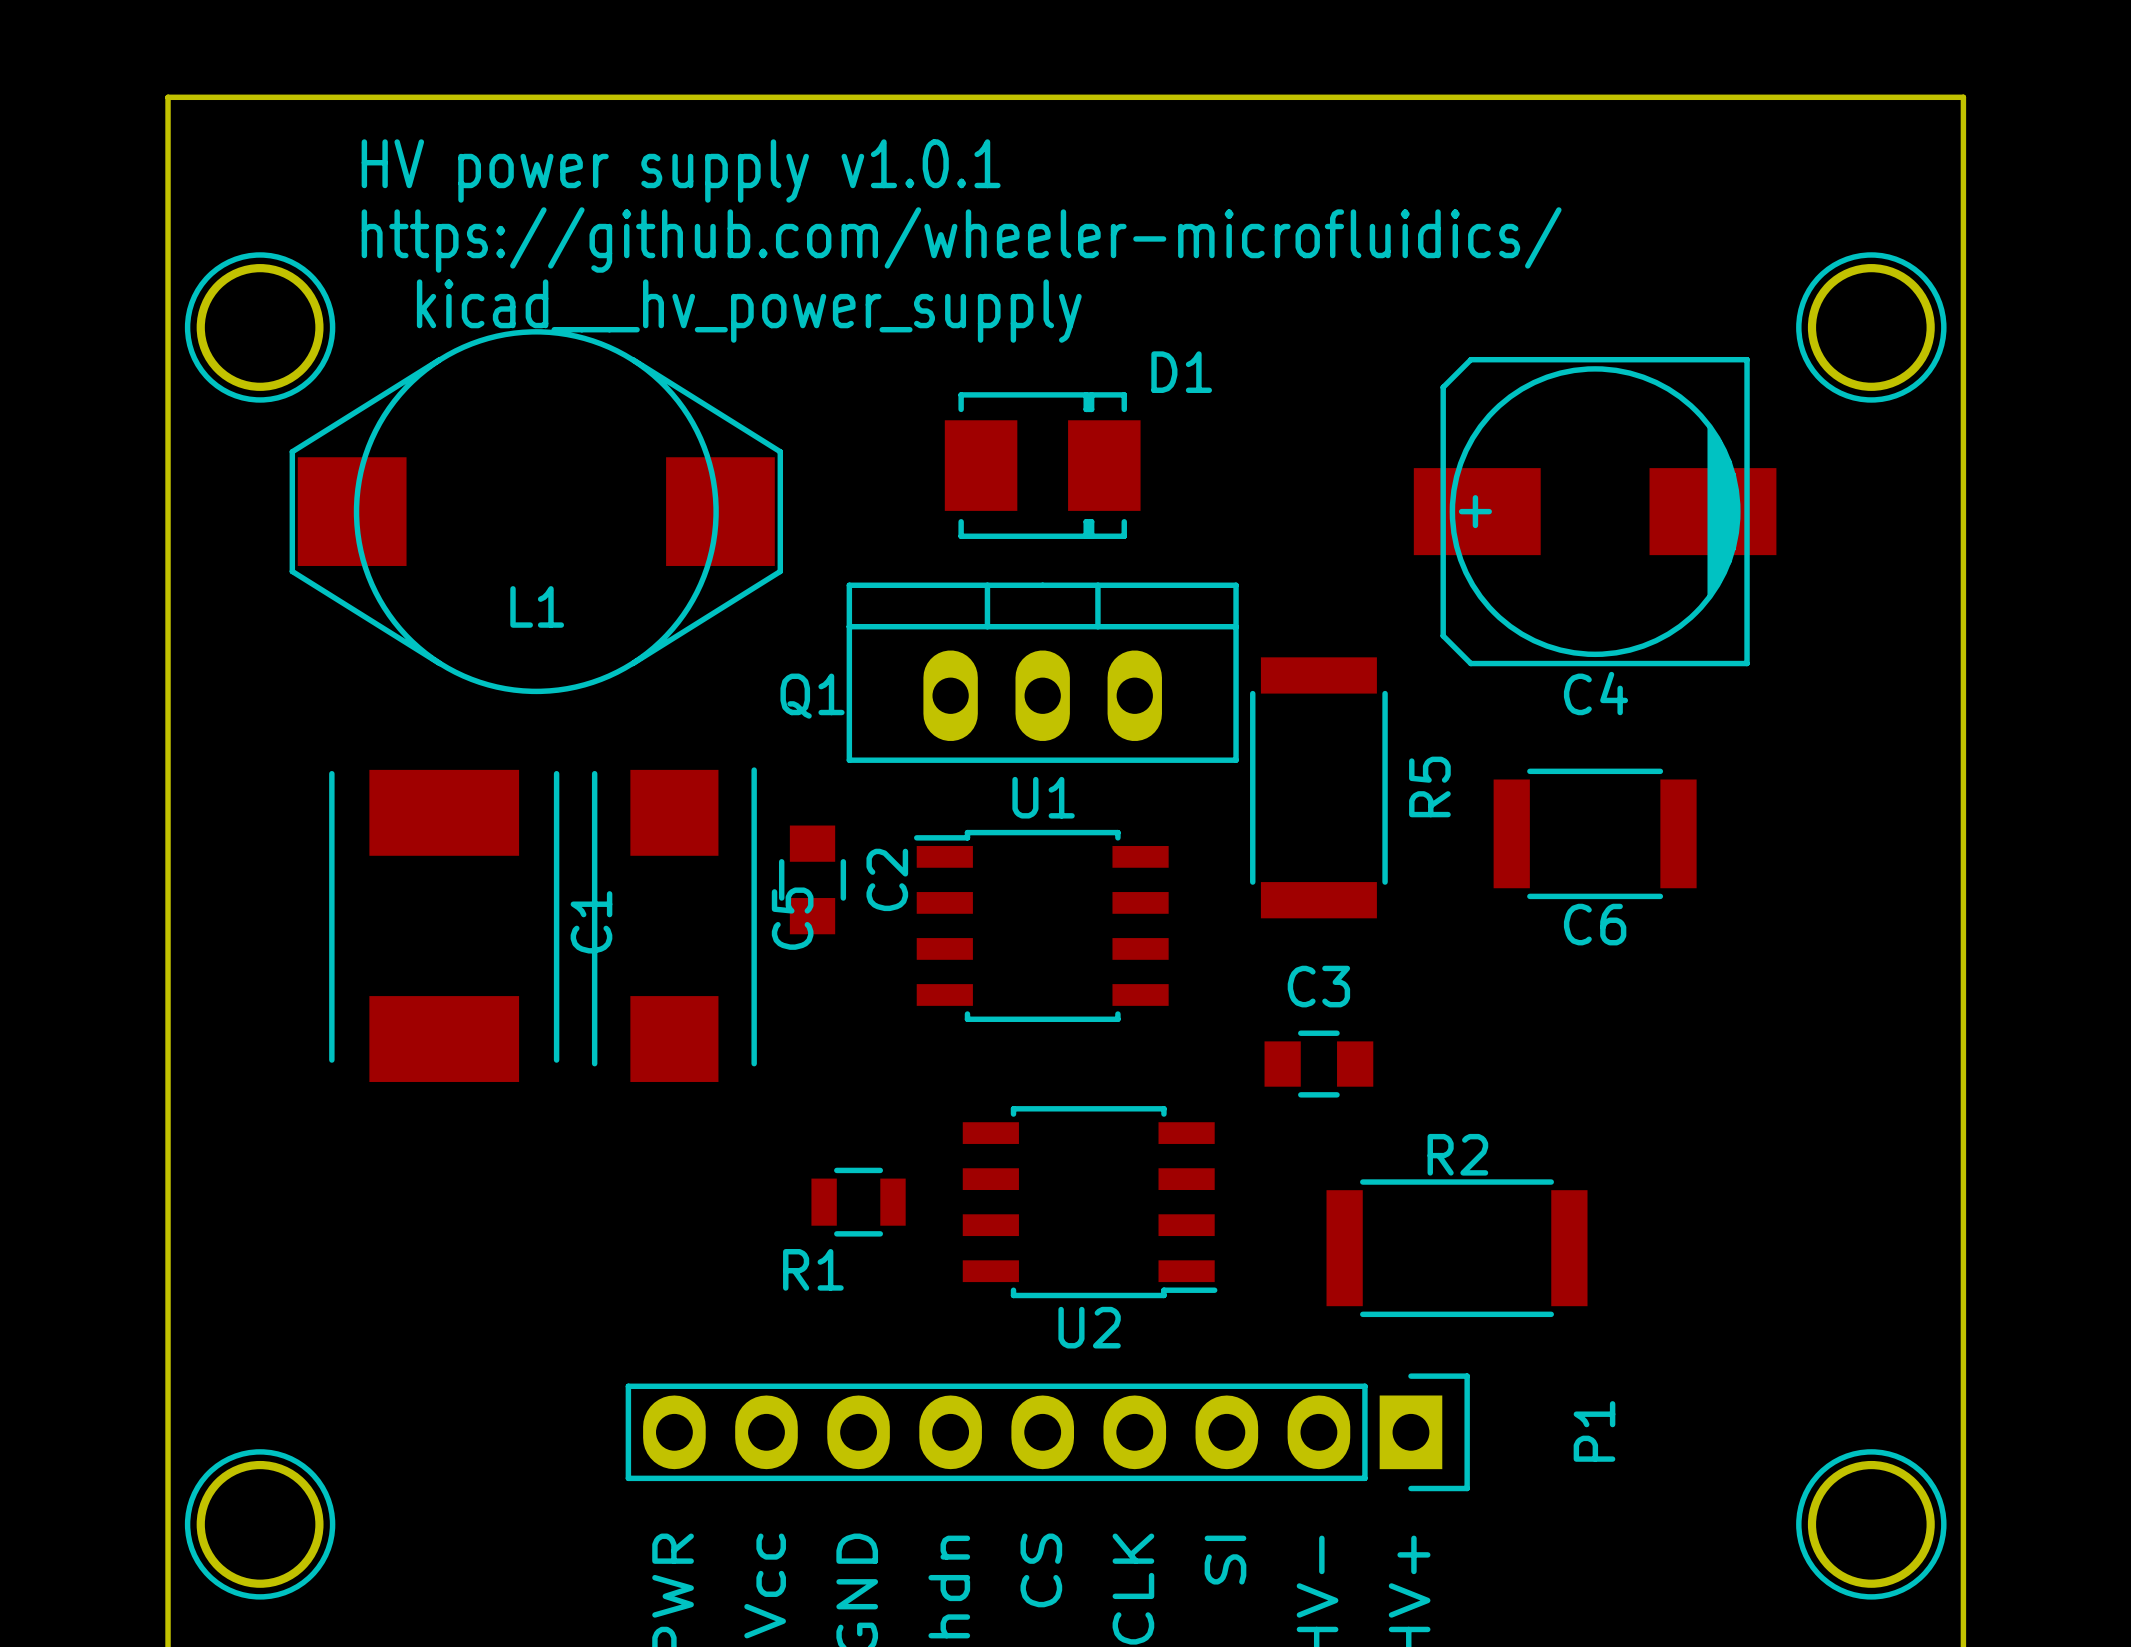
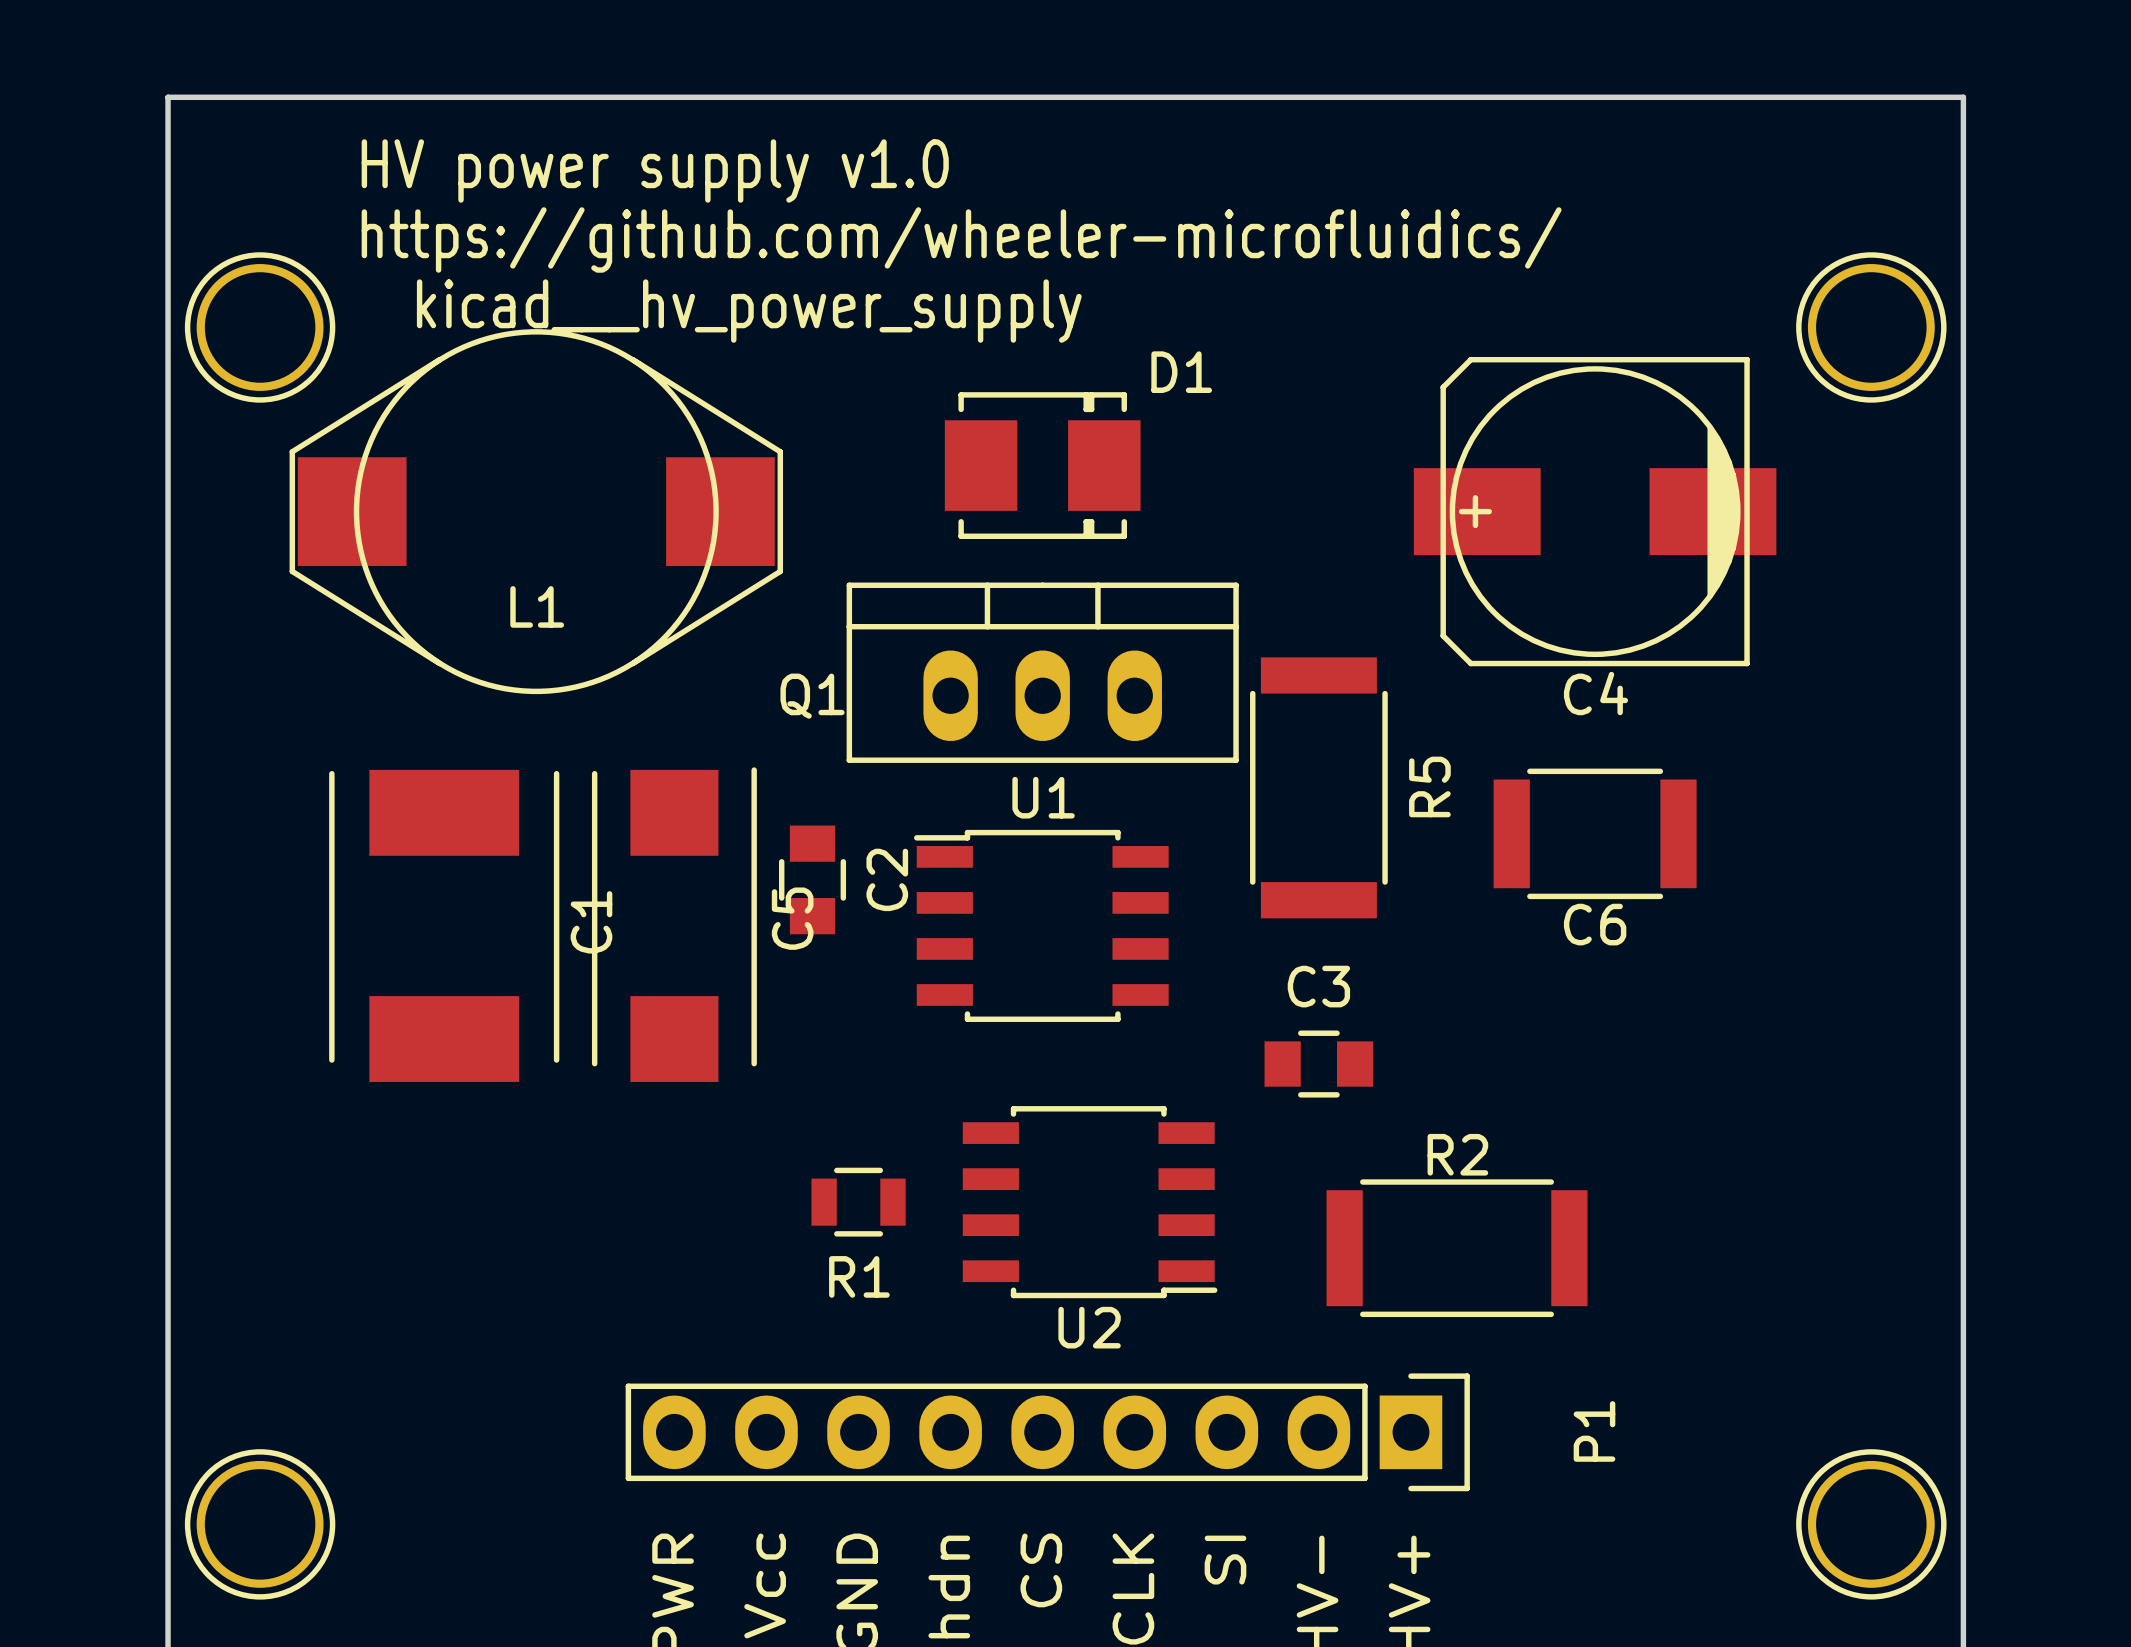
text: HV power supply v1.0.1 (681, 170) -> HV power supply v1.0 (655, 170)
R1 name position: R1 (813, 1269) -> R1 (859, 1276)

